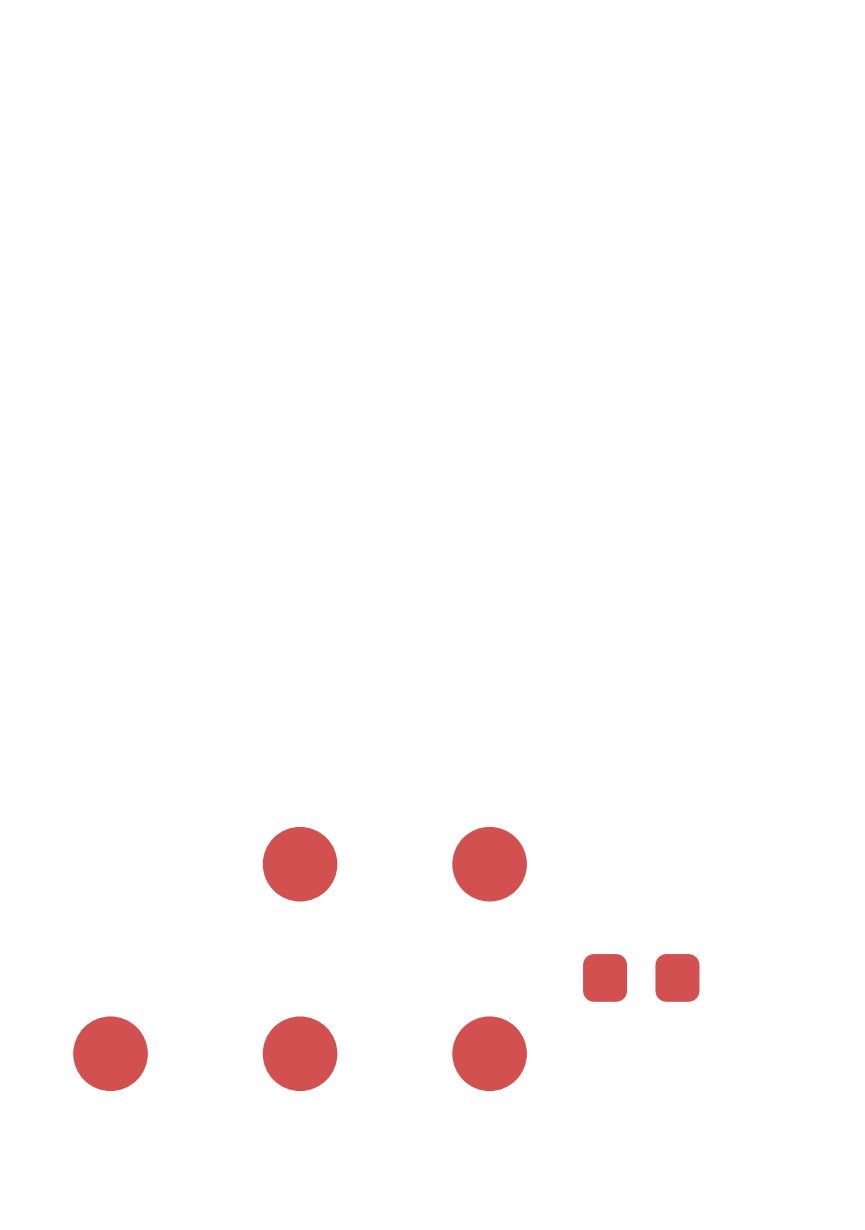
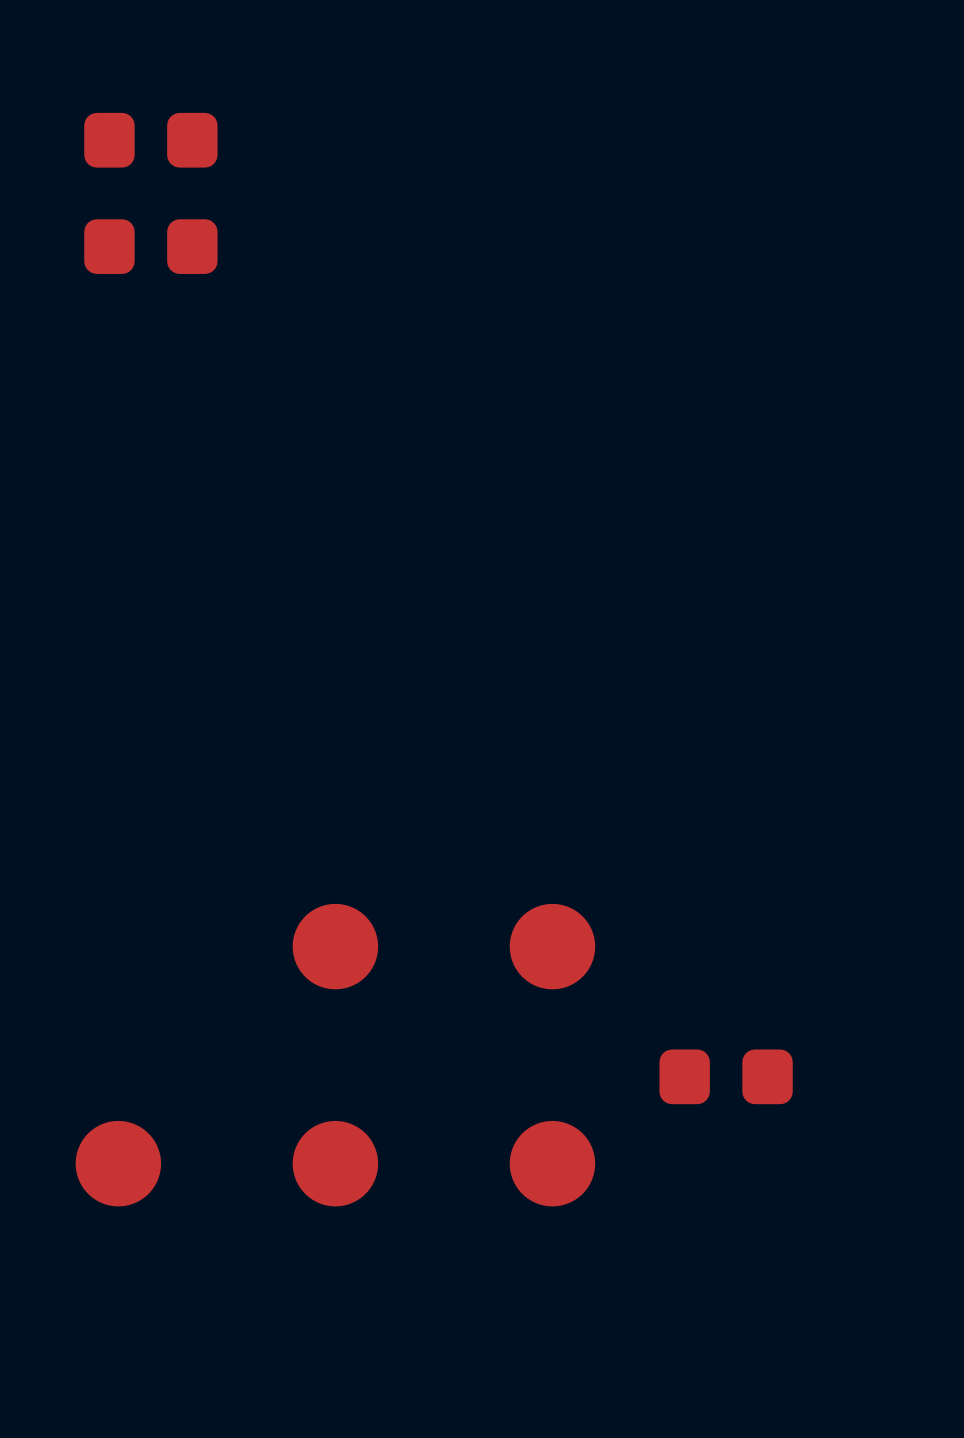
part: none -> (150, 140)
part: none -> (150, 246)

